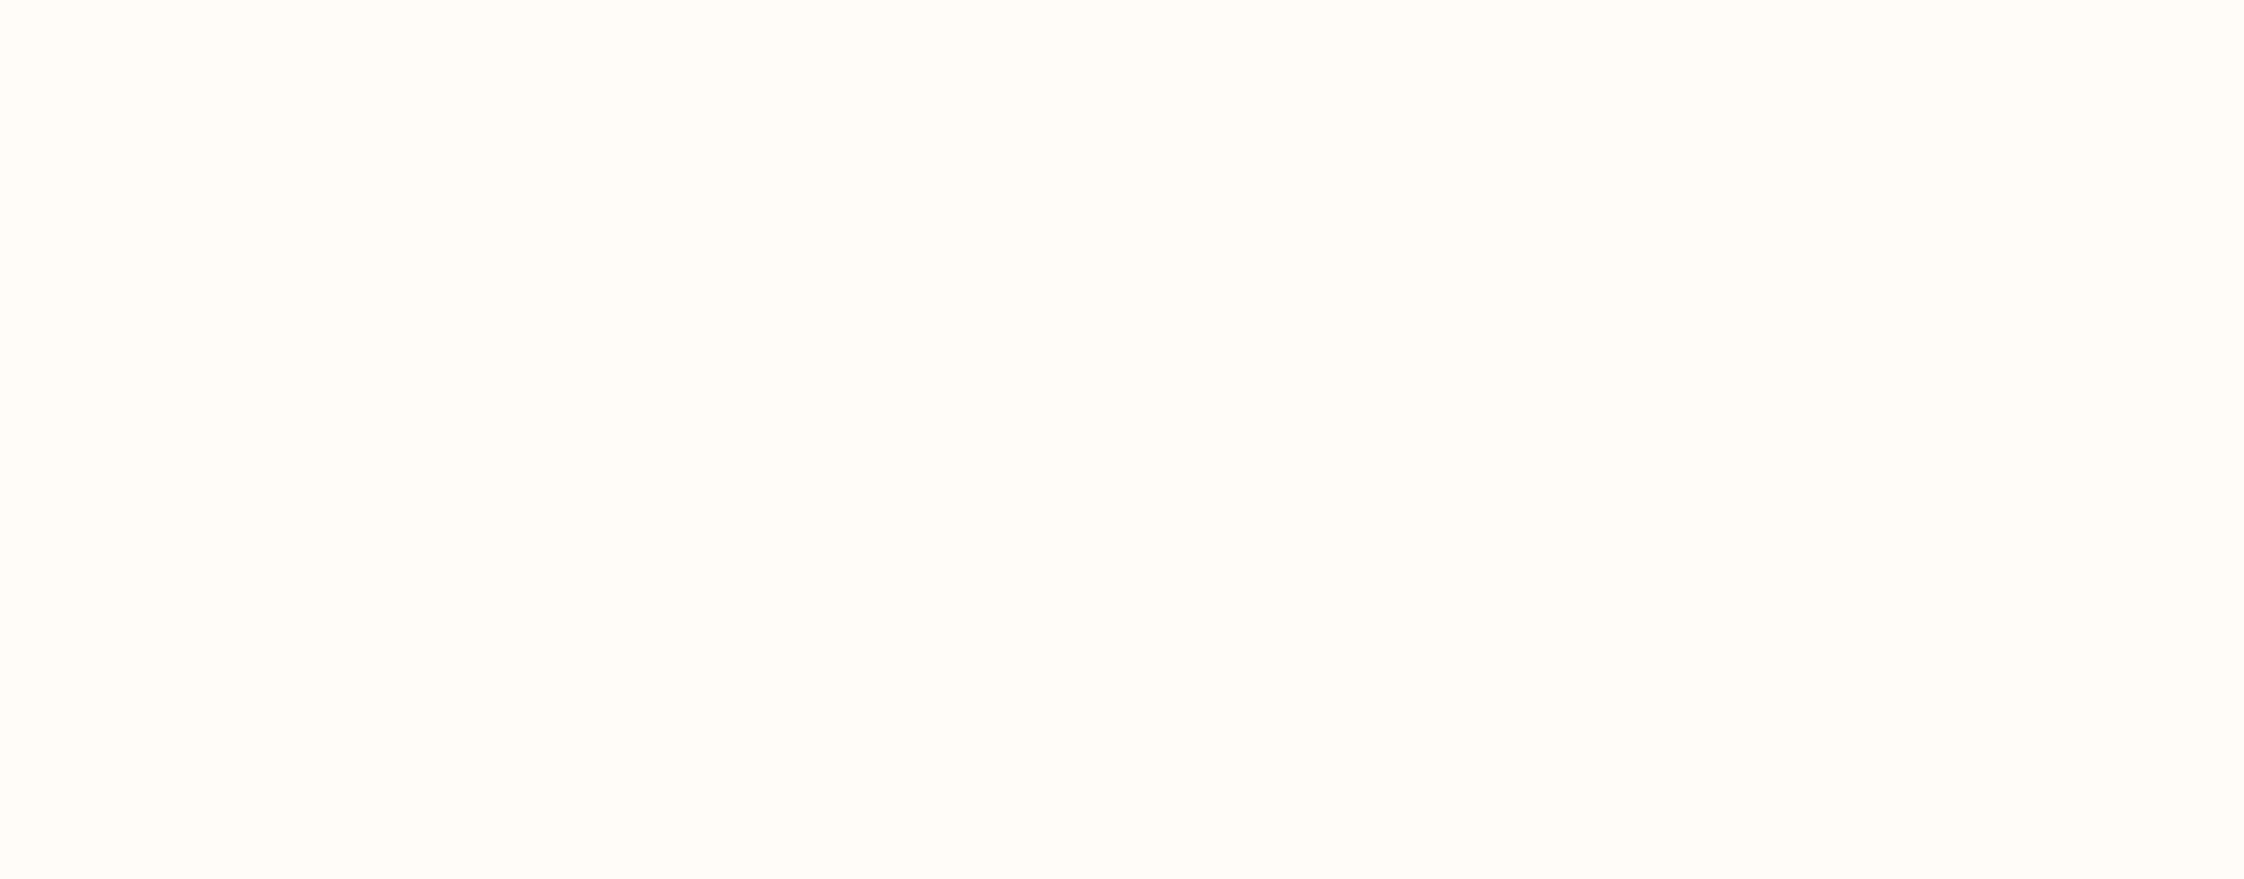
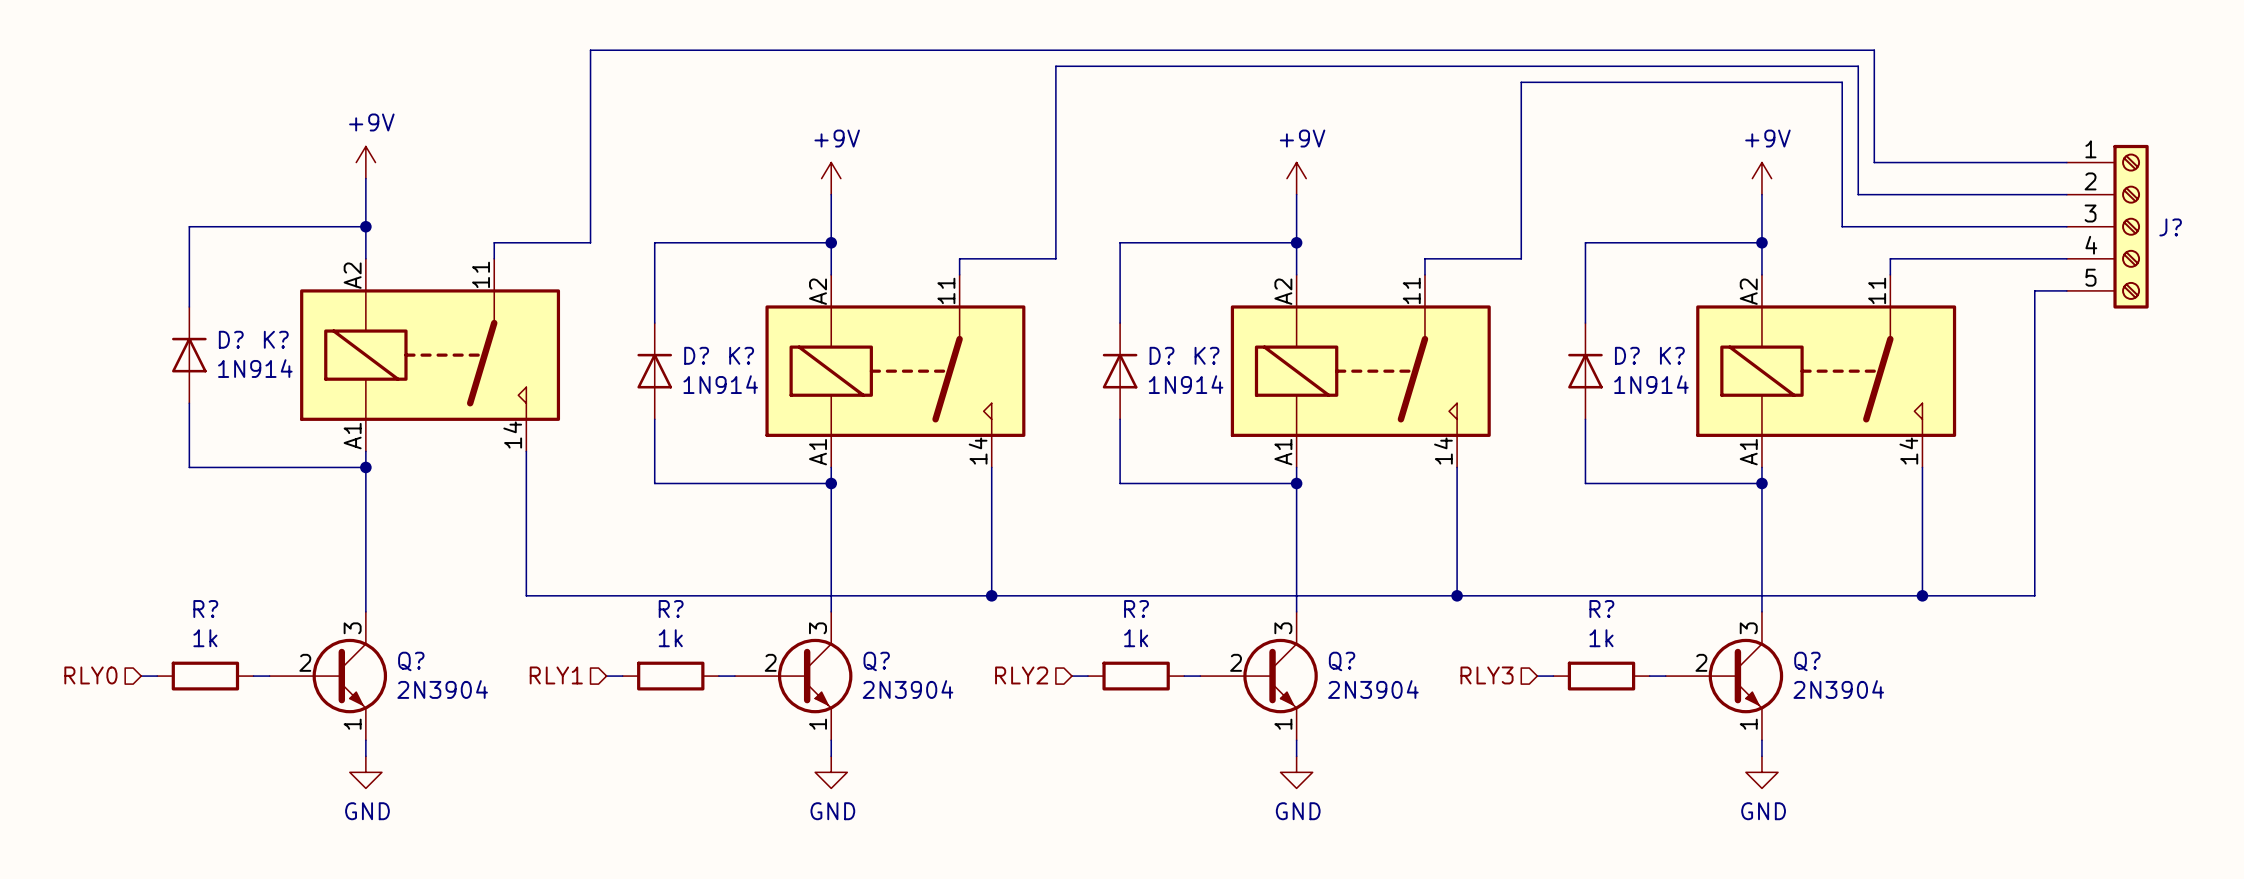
power symbol: none -> +9V (365, 162)
wire: none -> (2066, 162) (1874, 162) (1874, 50) (590, 50) (590, 242) (494, 242) (494, 258)
wire: none -> (365, 178) (365, 258)
power symbol: none -> +9V (831, 178)
power symbol: none -> +9V (1296, 178)
power symbol: none -> +9V (1761, 178)
wire: none -> (831, 194) (831, 274)
wire: none -> (1296, 194) (1296, 274)
wire: none -> (1761, 194) (1761, 274)
wire: none -> (2066, 194) (1858, 194) (1858, 66) (1055, 66) (1055, 258) (959, 258) (959, 274)
wire: none -> (365, 226) (189, 226) (189, 306)
junction: none -> (365, 226)
wire: none -> (2066, 226) (1842, 226) (1842, 82) (1521, 82) (1521, 258) (1424, 258) (1424, 274)
J?: none -> (2107, 226)
wire: none -> (831, 242) (654, 242) (654, 323)
junction: none -> (831, 242)
wire: none -> (1296, 242) (1120, 242) (1120, 323)
junction: none -> (1296, 242)
wire: none -> (1761, 242) (1585, 242) (1585, 323)
junction: none -> (1761, 242)
wire: none -> (2066, 258) (1890, 258) (1890, 274)
wire: none -> (2066, 290) (2034, 290) (2034, 595) (526, 595) (526, 451)
D?: none -> 1N914 (189, 355)
K?: none -> (430, 355)
D?: none -> 1N914 (654, 371)
K?: none -> (895, 371)
D?: none -> 1N914 (1120, 371)
K?: none -> (1360, 371)
D?: none -> 1N914 (1585, 371)
K?: none -> (1826, 371)
wire: none -> (189, 403) (189, 467) (365, 467)
wire: none -> (654, 419) (654, 483) (831, 483)
wire: none -> (1120, 419) (1120, 483) (1296, 483)
wire: none -> (1585, 419) (1585, 483) (1761, 483)
wire: none -> (365, 451) (365, 611)
junction: none -> (365, 467)
wire: none -> (831, 467) (831, 611)
wire: none -> (991, 467) (991, 595)
wire: none -> (1296, 467) (1296, 611)
wire: none -> (1457, 467) (1457, 595)
wire: none -> (1761, 467) (1761, 611)
wire: none -> (1922, 467) (1922, 595)
junction: none -> (831, 483)
junction: none -> (1296, 483)
junction: none -> (1761, 483)
junction: none -> (991, 595)
junction: none -> (1457, 595)
junction: none -> (1922, 595)
hierarchical label: none -> RLY0 (90, 675)
hierarchical label: none -> RLY1 (556, 675)
hierarchical label: none -> RLY2 (1021, 675)
hierarchical label: none -> RLY3 (1487, 675)
wire: none -> (141, 676) (157, 676)
R?: none -> 1k (205, 676)
wire: none -> (253, 676) (269, 676)
Q?: none -> 2N3904 (328, 676)
wire: none -> (606, 676) (622, 676)
R?: none -> 1k (670, 676)
wire: none -> (718, 676) (734, 676)
Q?: none -> 2N3904 (793, 676)
wire: none -> (1071, 676) (1087, 676)
R?: none -> 1k (1136, 676)
wire: none -> (1184, 676) (1200, 676)
Q?: none -> 2N3904 (1259, 676)
wire: none -> (1537, 676) (1553, 676)
R?: none -> 1k (1601, 676)
wire: none -> (1649, 676) (1665, 676)
Q?: none -> 2N3904 (1724, 676)
wire: none -> (365, 740) (365, 756)
wire: none -> (831, 740) (831, 756)
wire: none -> (1296, 740) (1296, 756)
wire: none -> (1761, 740) (1761, 756)
power symbol: none -> GND (365, 772)
power symbol: none -> GND (831, 772)
power symbol: none -> GND (1296, 772)
power symbol: none -> GND (1761, 772)

